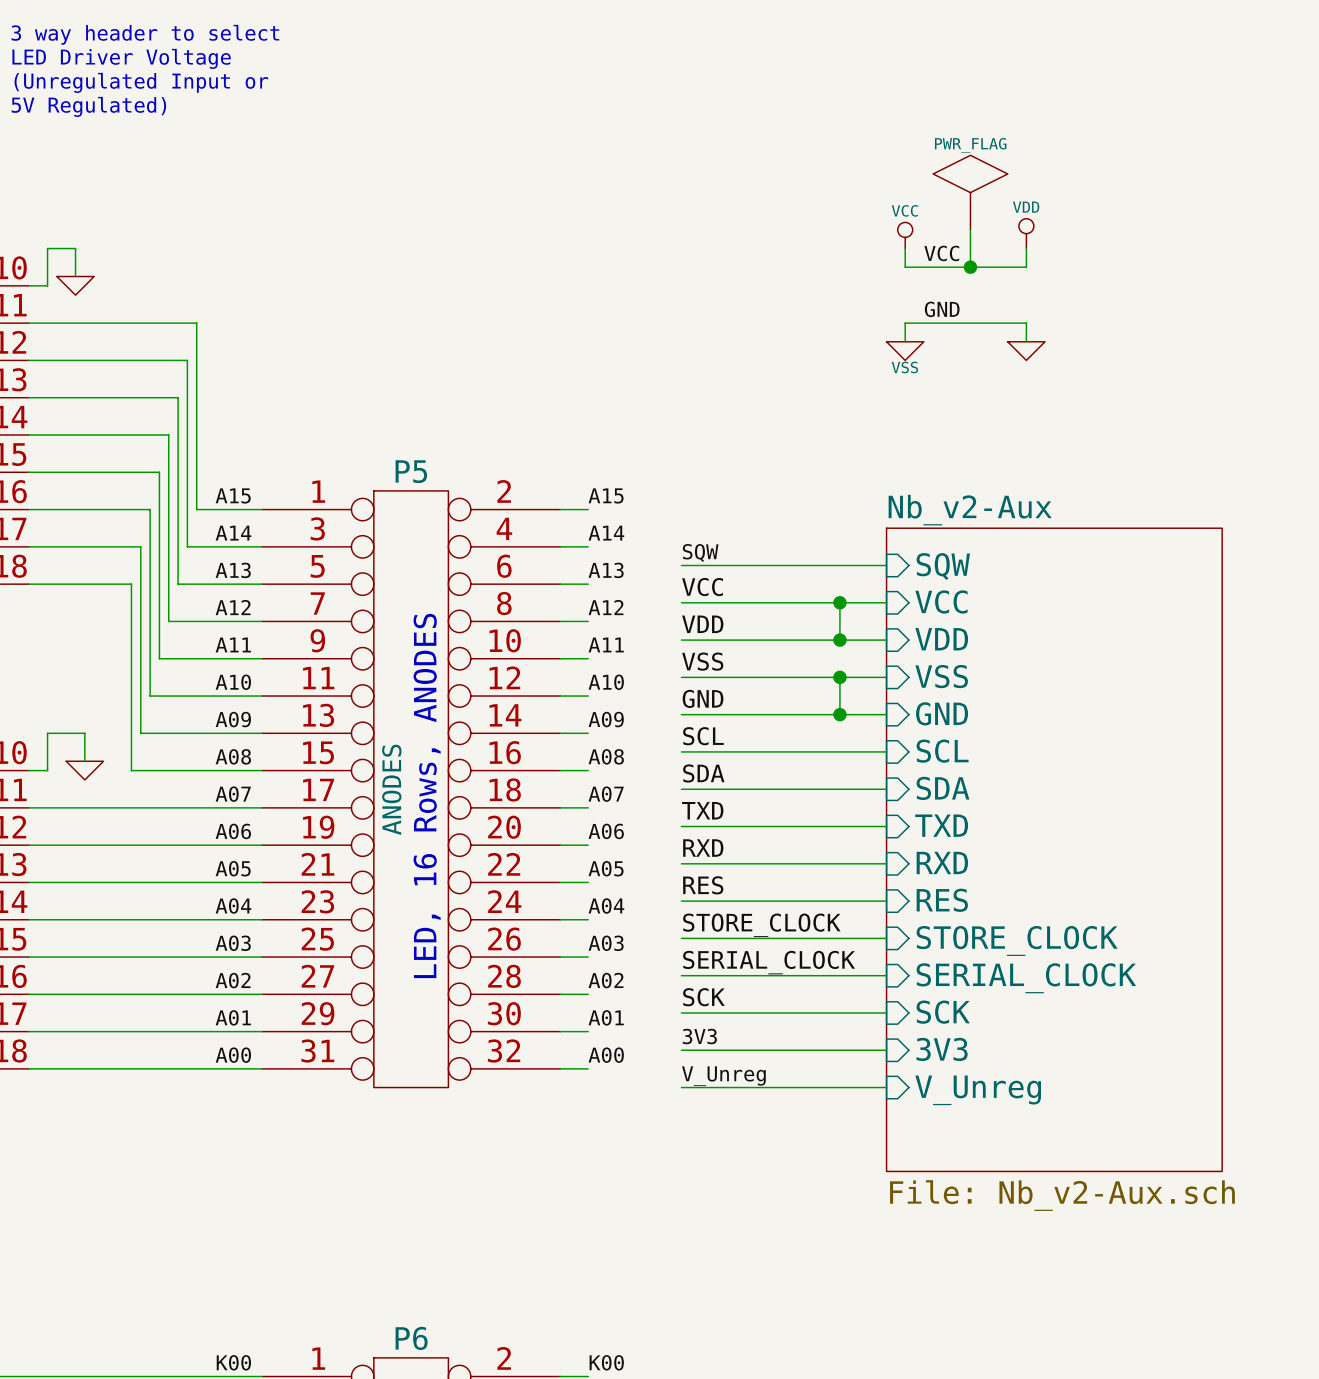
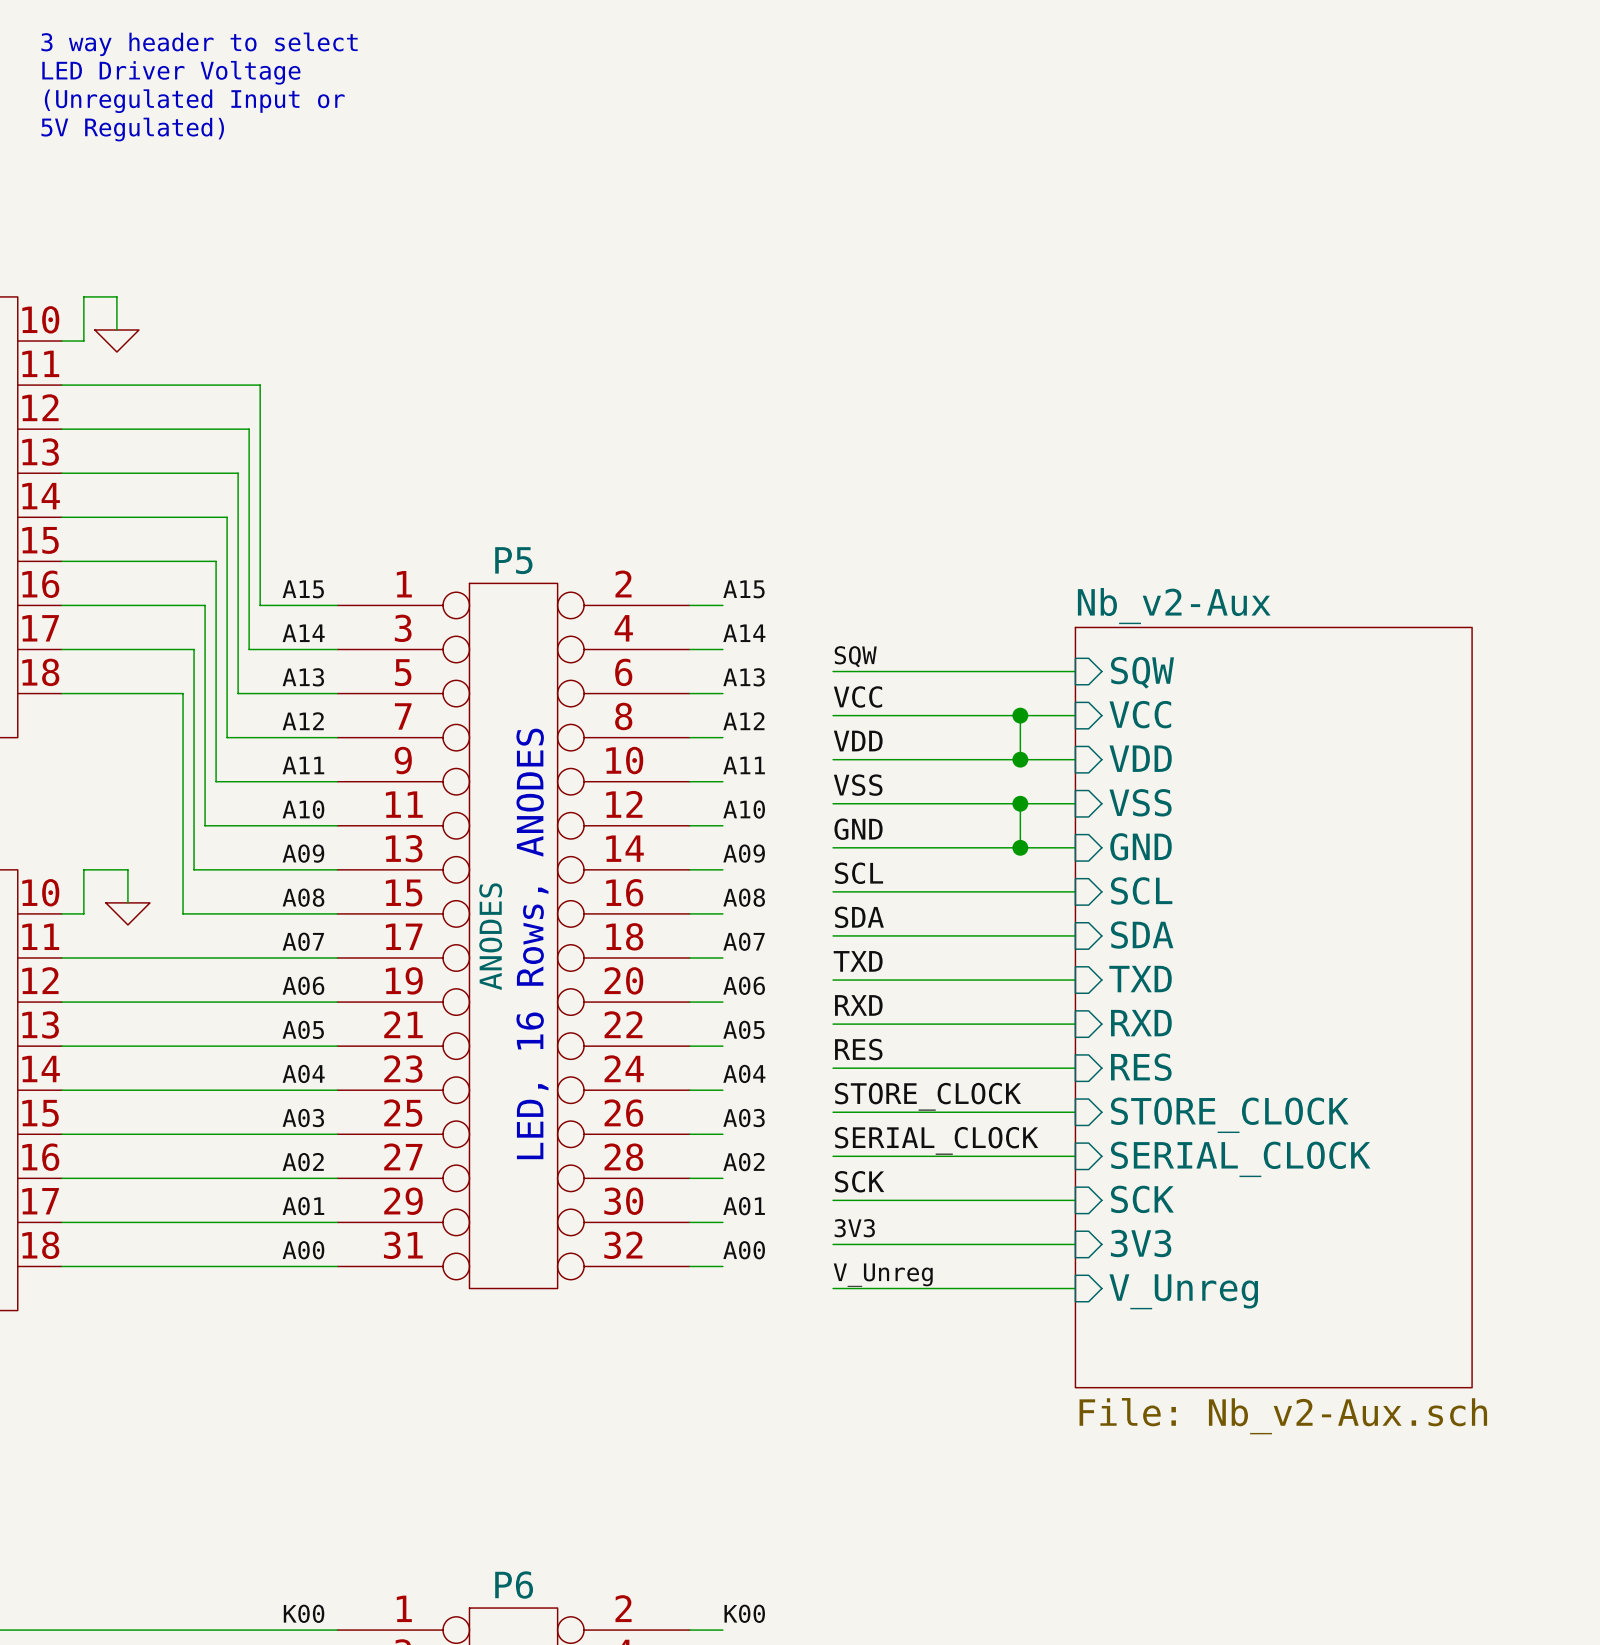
power symbol: PWR_FLAG (970, 192) -> none
wire: (970, 229) (970, 267) -> none
power symbol: VDD (1026, 233) -> none
power symbol: VCC (905, 235) -> none
wire: (905, 248) (905, 267) (1026, 267) (1026, 248) -> none
label: VCC (941, 253) -> none
junction: (970, 267) -> none
label: GND (942, 309) -> none
wire: (905, 341) (905, 323) (1026, 323) (1026, 341) -> none
power symbol: VSS (905, 351) -> none
power symbol: (1026, 351) -> none

